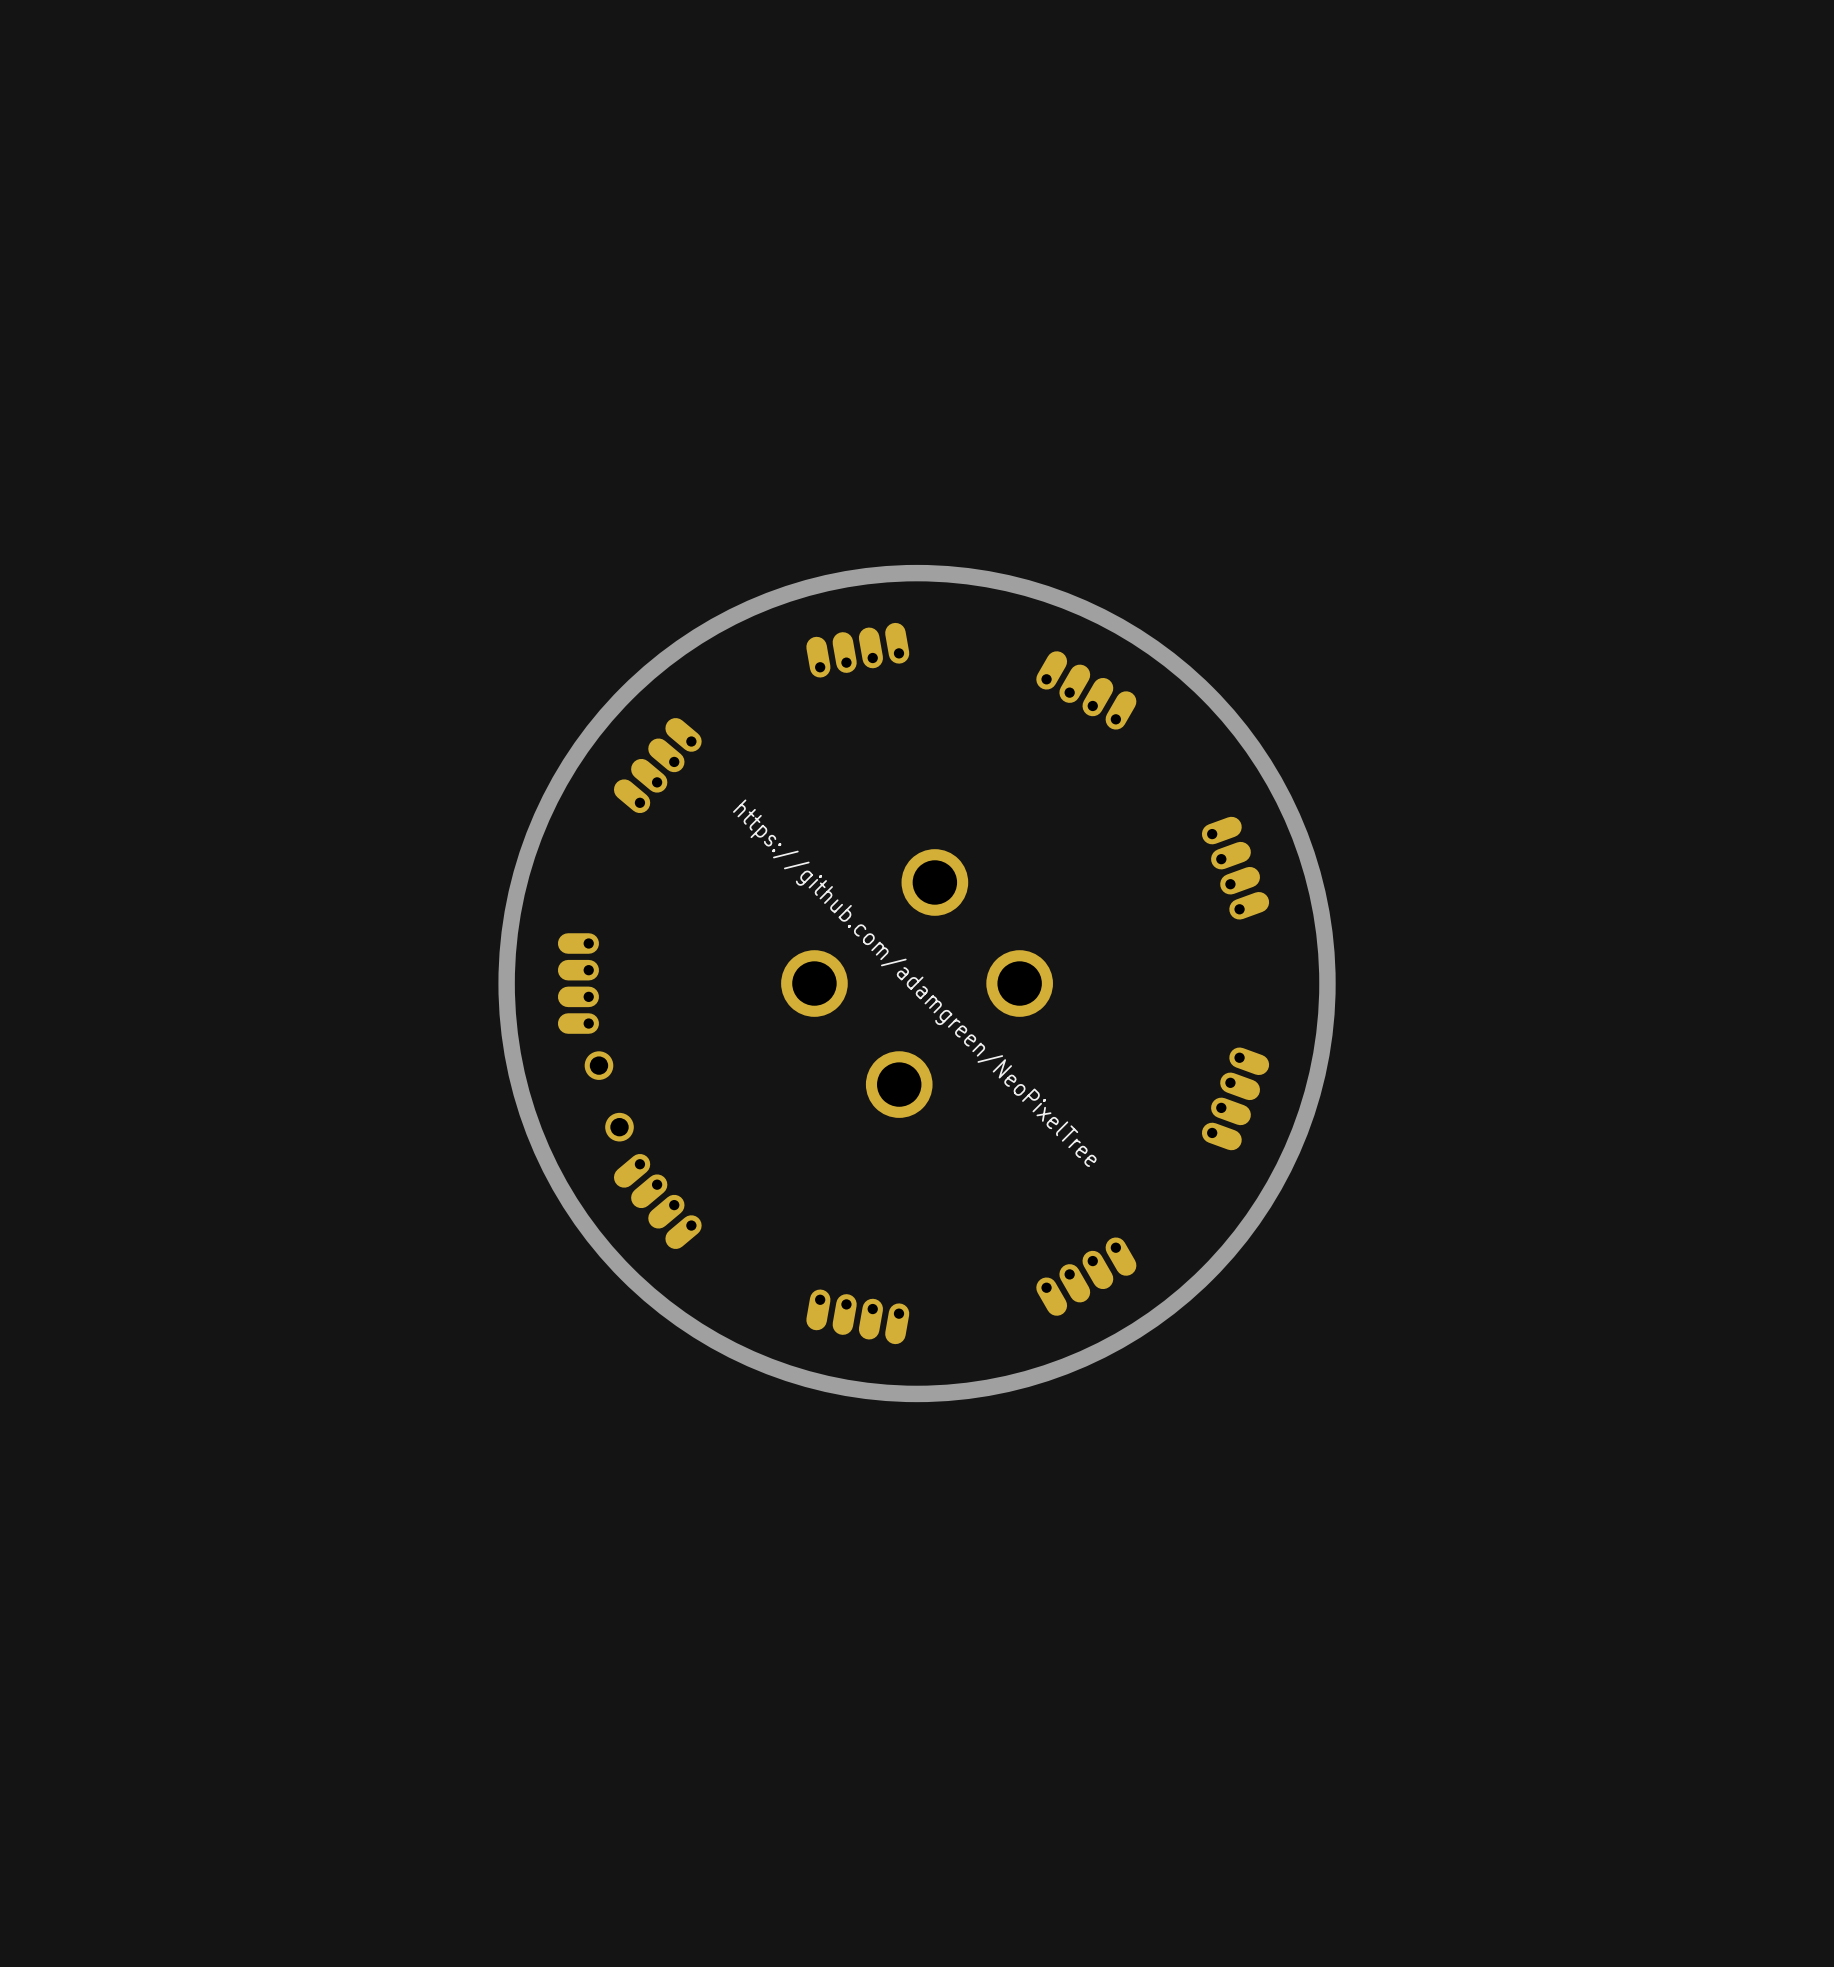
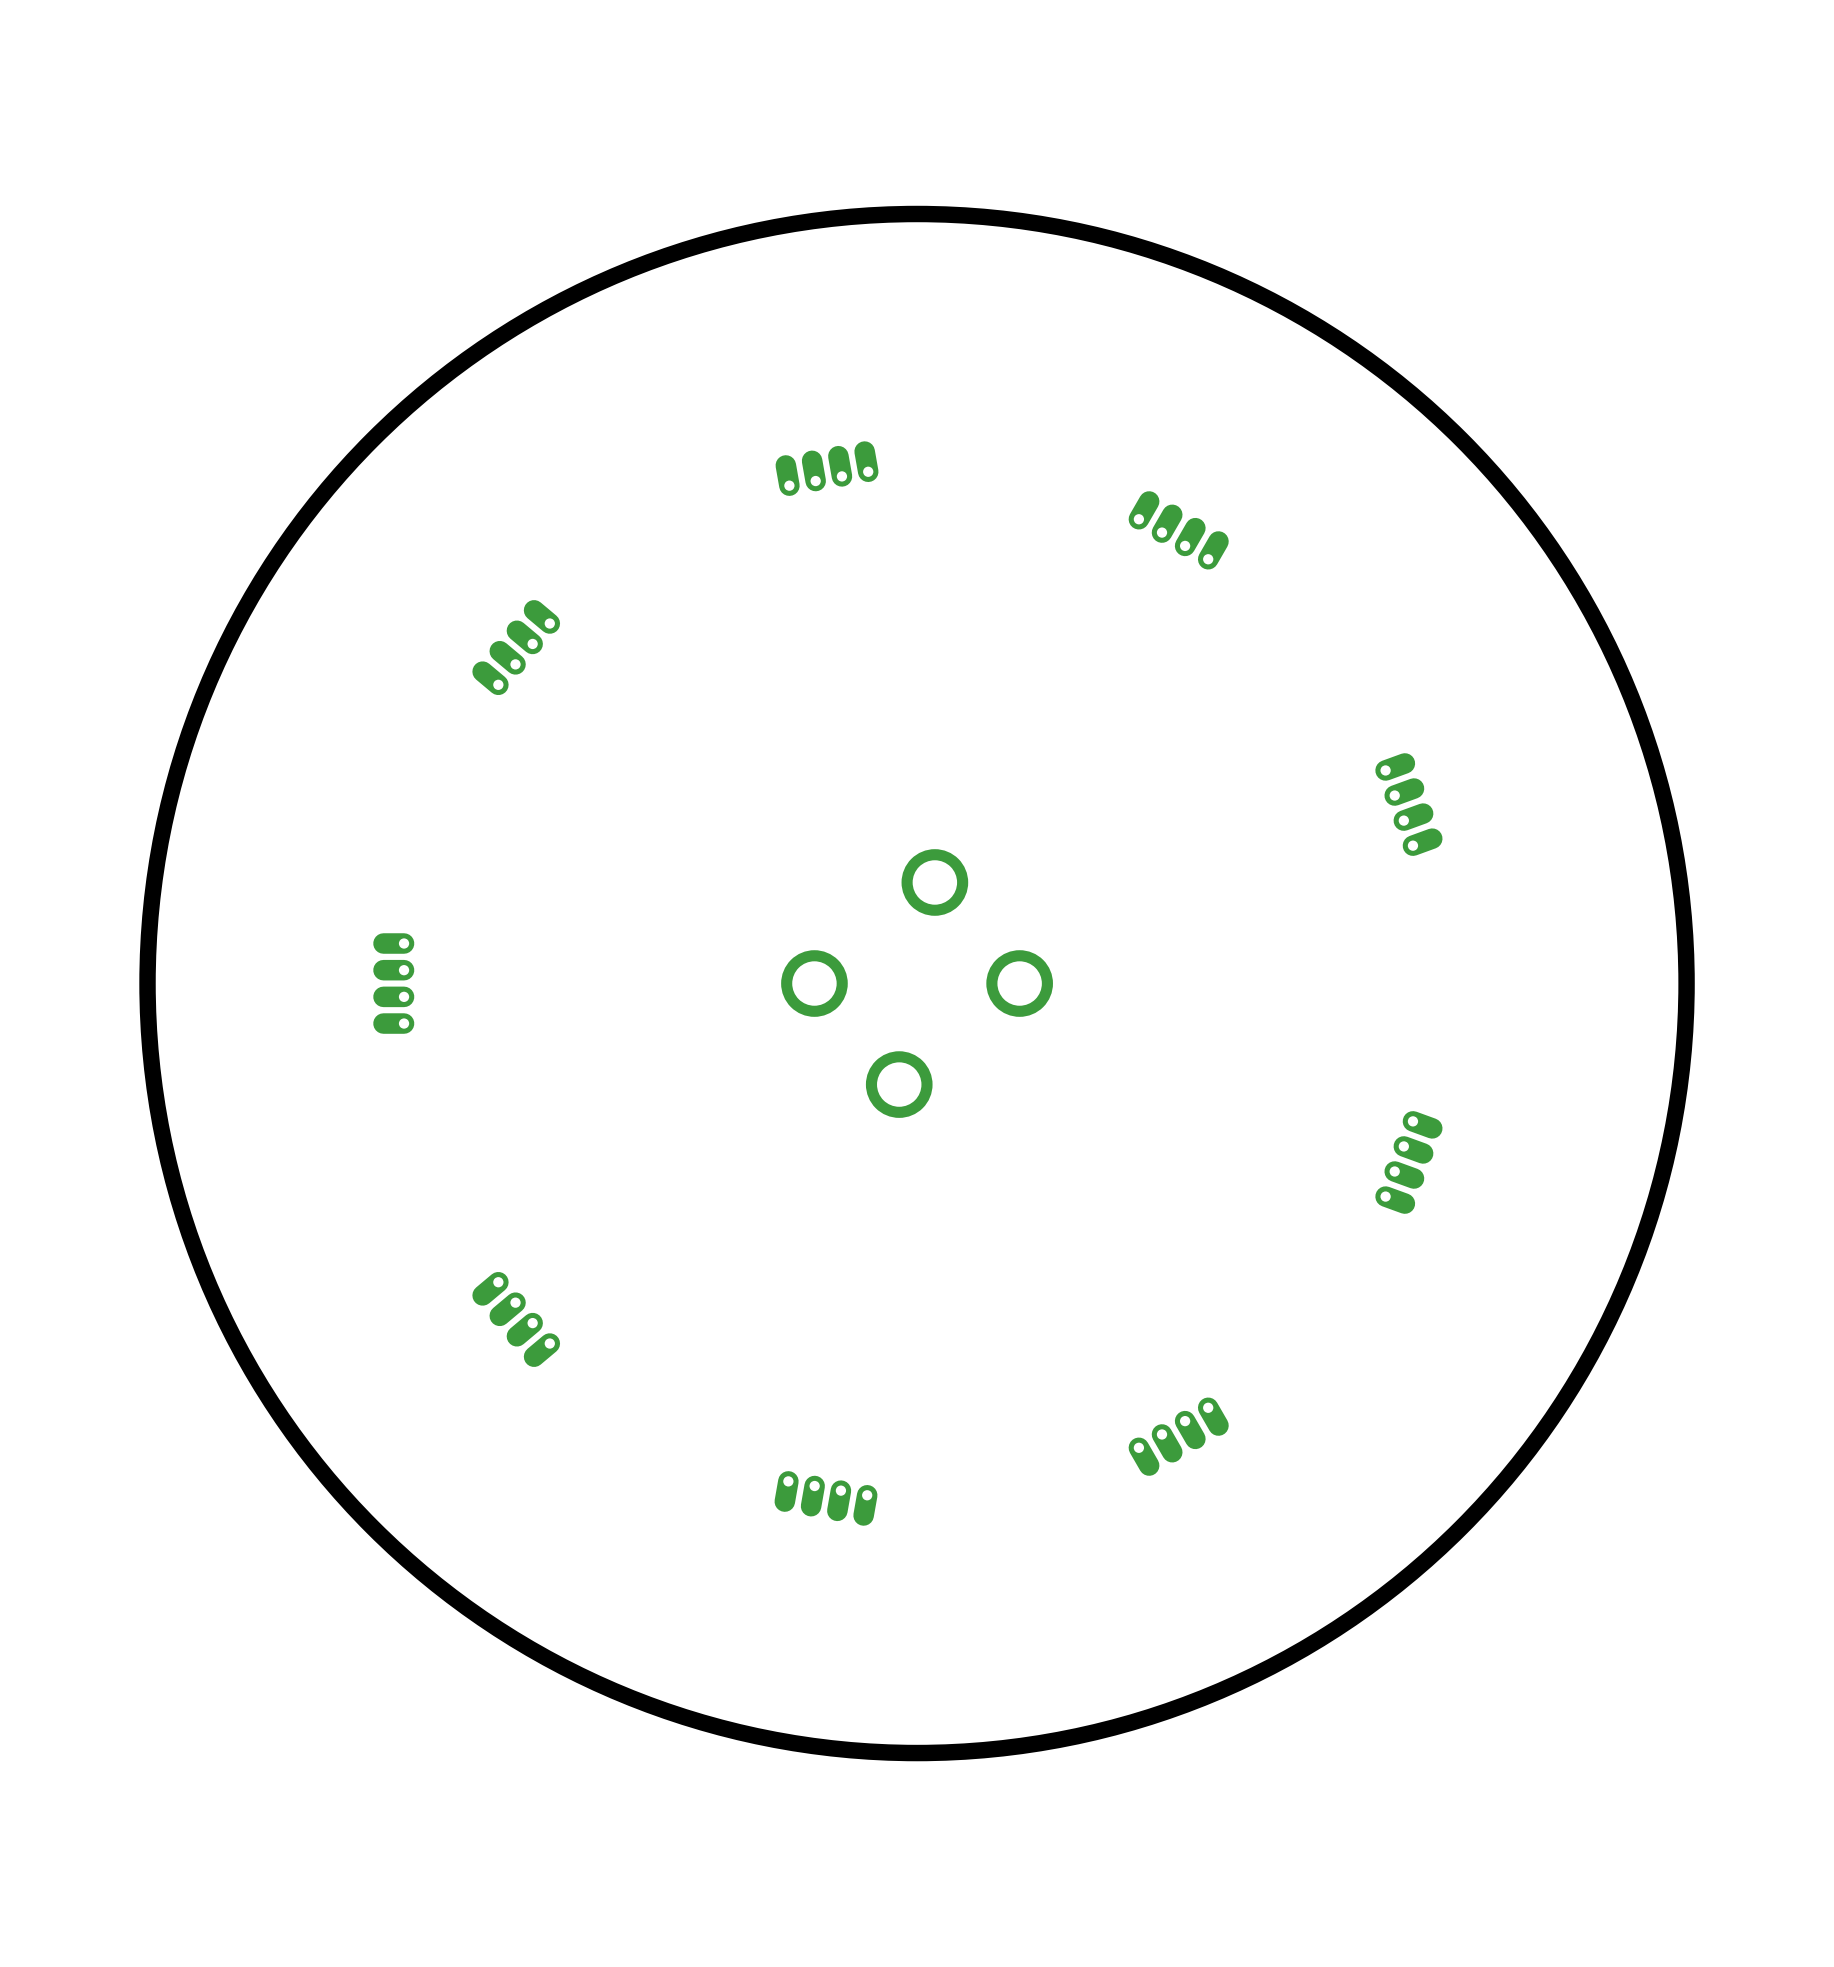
round board edge size: [498, 564, 1336, 1403] -> [139, 205, 1695, 1762]
part position: (857, 650) -> (827, 468)
part position: (1086, 690) -> (1178, 530)
part position: (657, 765) -> (516, 647)
part position: (1235, 868) -> (1408, 804)
part position: (578, 983) -> (393, 983)
text: https://github.com/adamgreen/NeoPixelTree (914, 983) -> none
part: (598, 1065) -> none
part position: (1235, 1098) -> (1408, 1162)
part: (619, 1127) -> none
part position: (657, 1201) -> (516, 1319)
part position: (1086, 1276) -> (1178, 1436)
part position: (857, 1316) -> (826, 1498)

